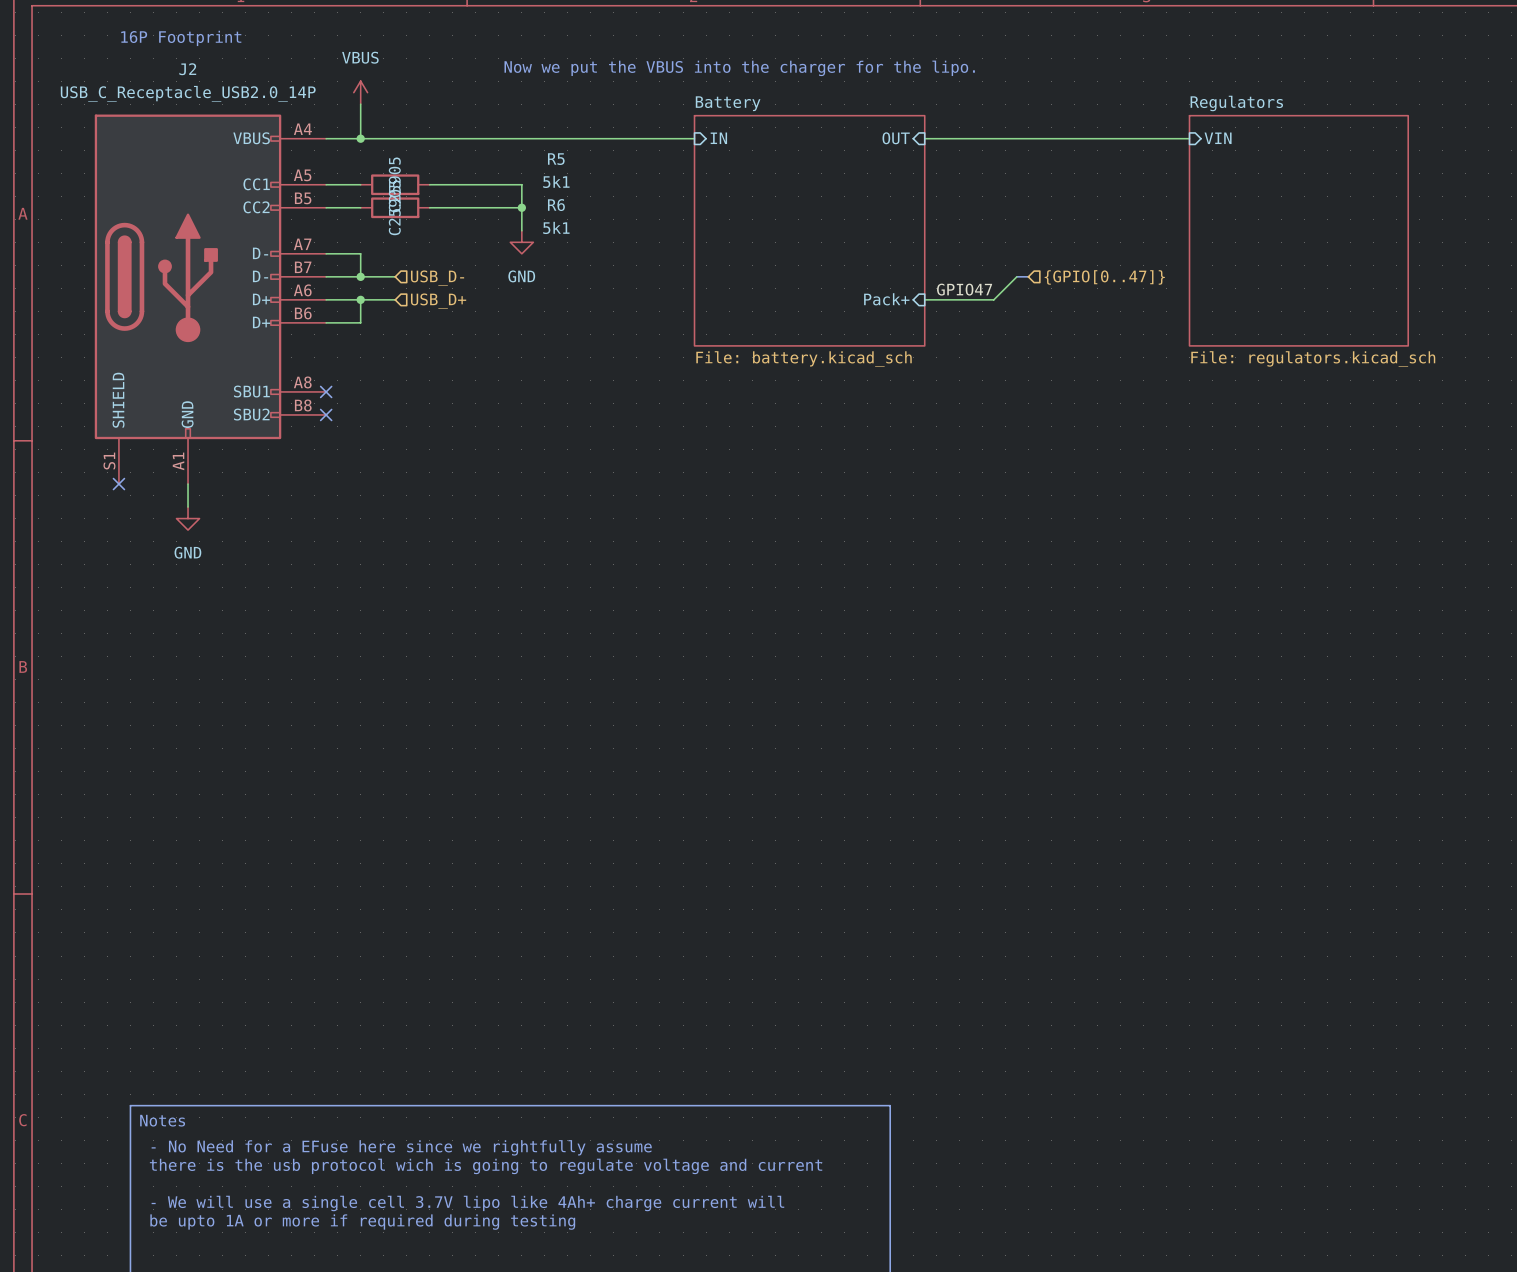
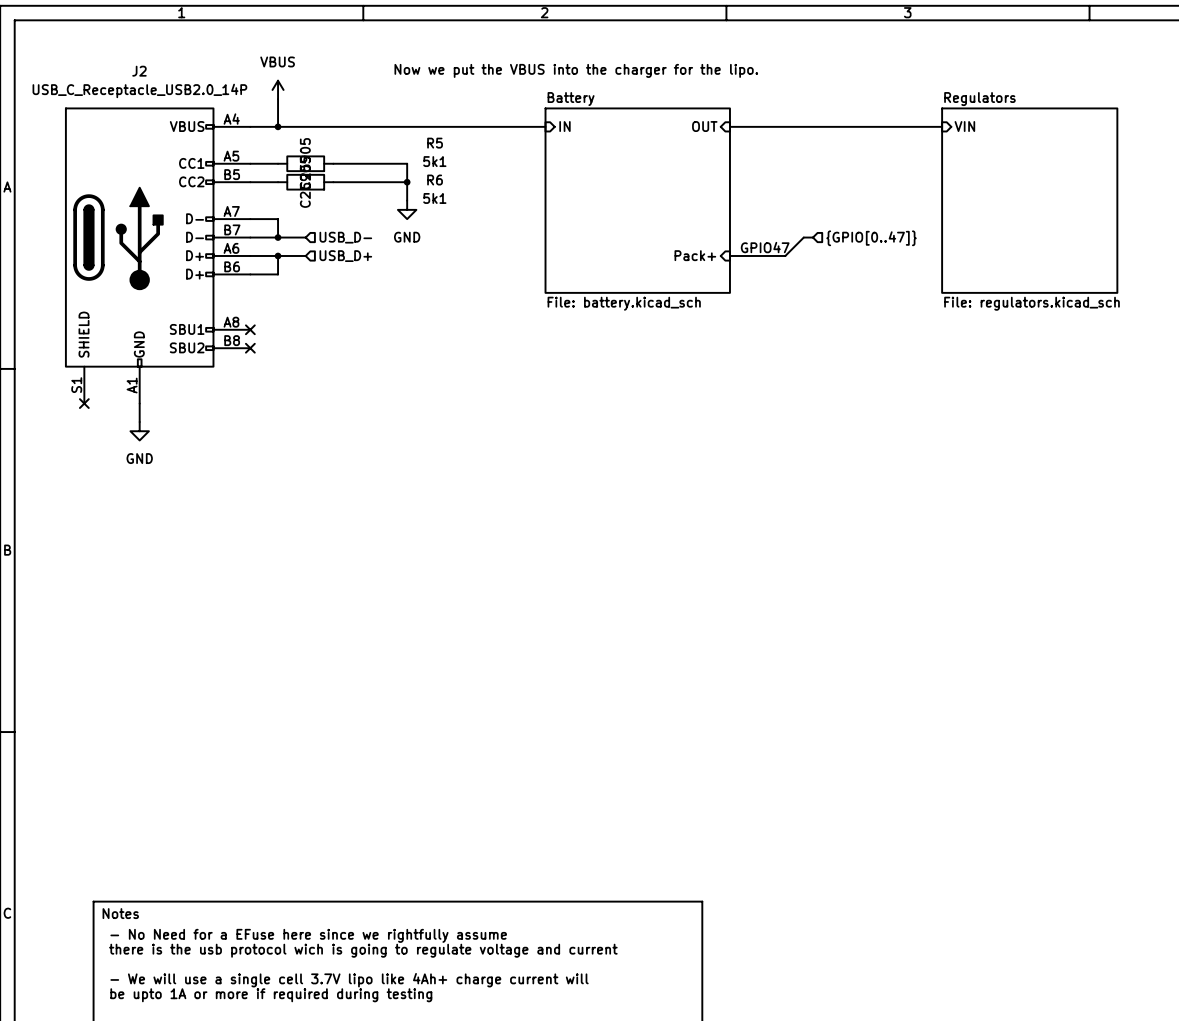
text: 16P Footprint (181, 38) -> none

